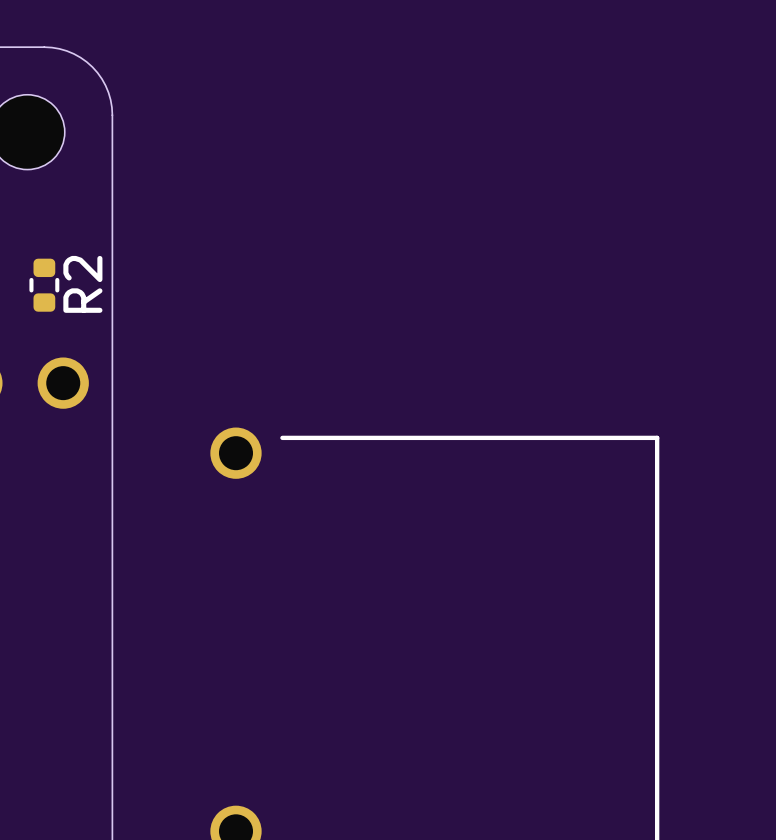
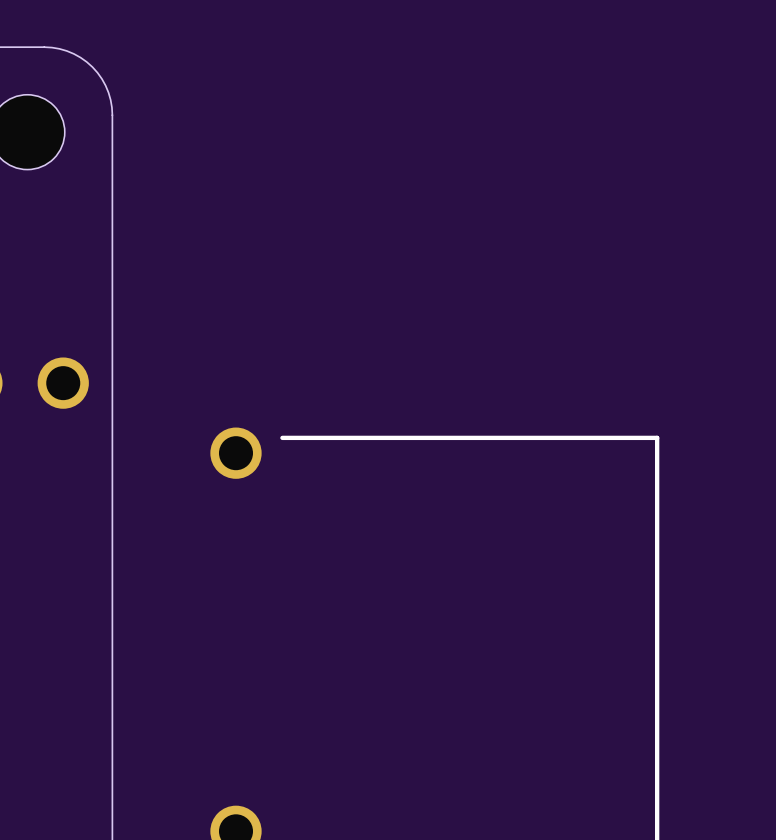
R2: (44, 285) -> none

